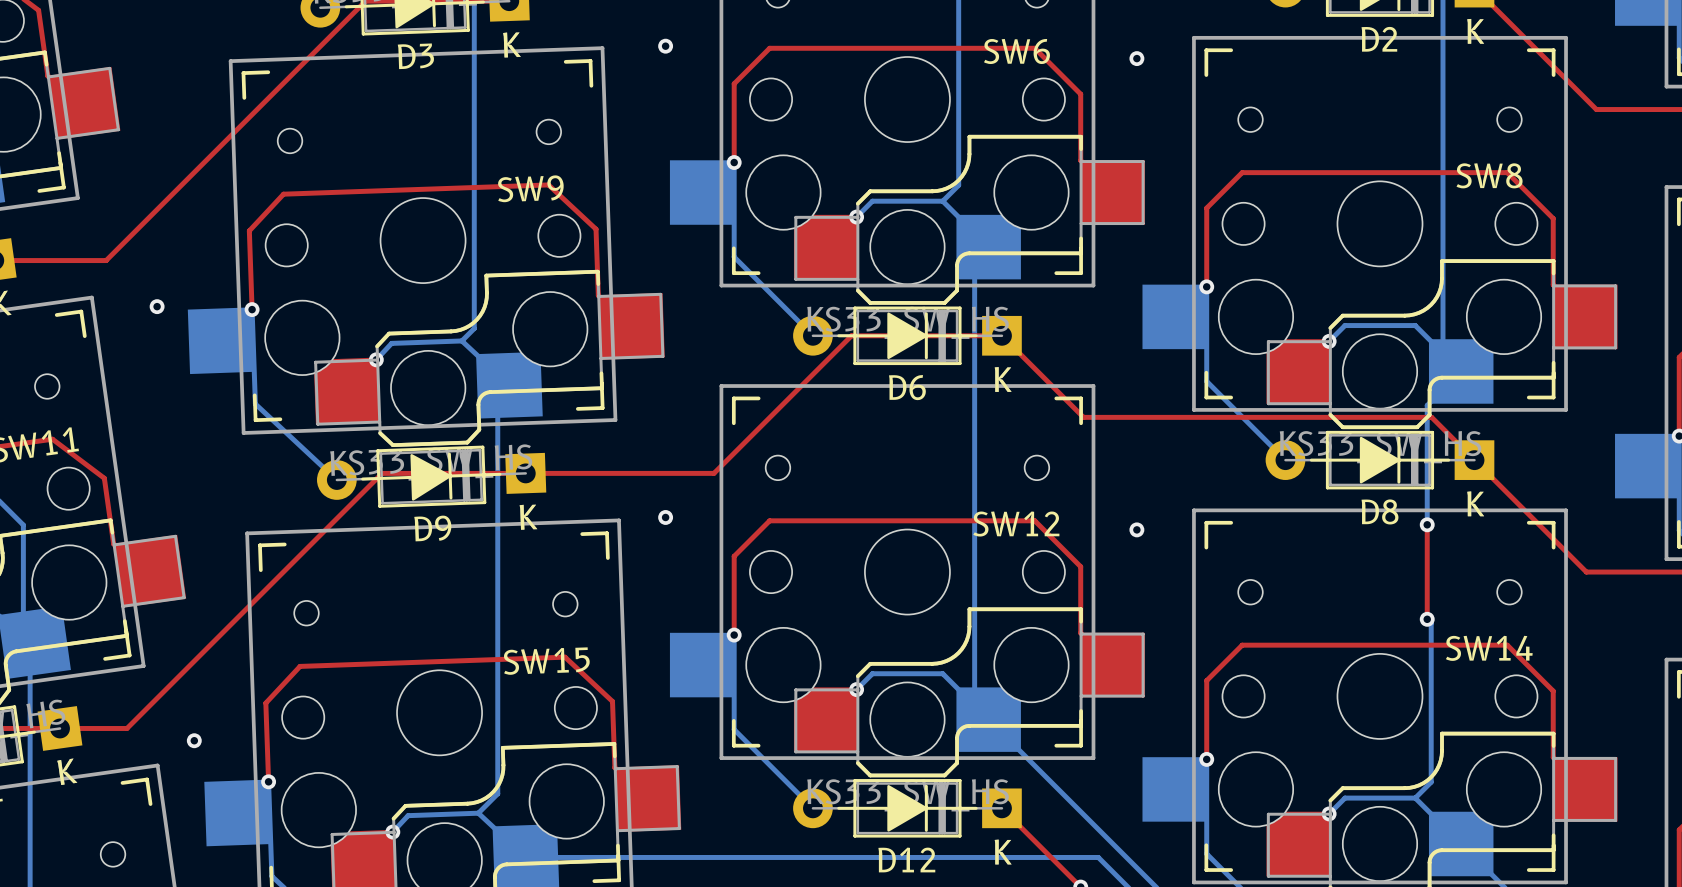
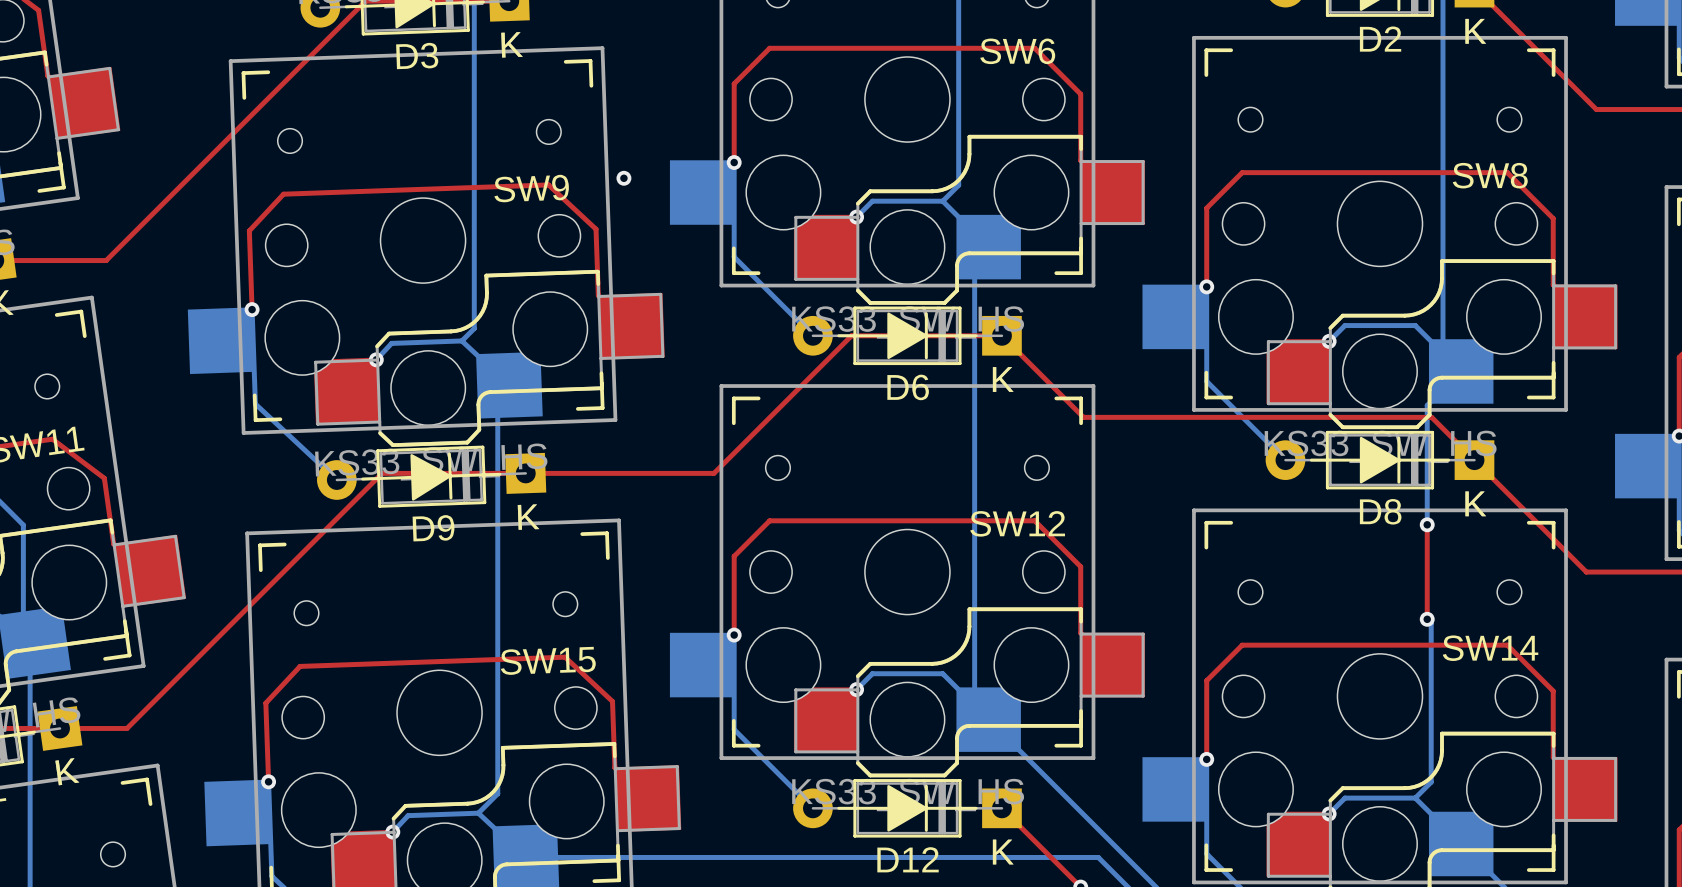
via position: (665, 46) -> (623, 178)
via: (1136, 58) -> none
via: (157, 306) -> none
via: (665, 517) -> none
via: (1136, 529) -> none
via: (194, 740) -> none

